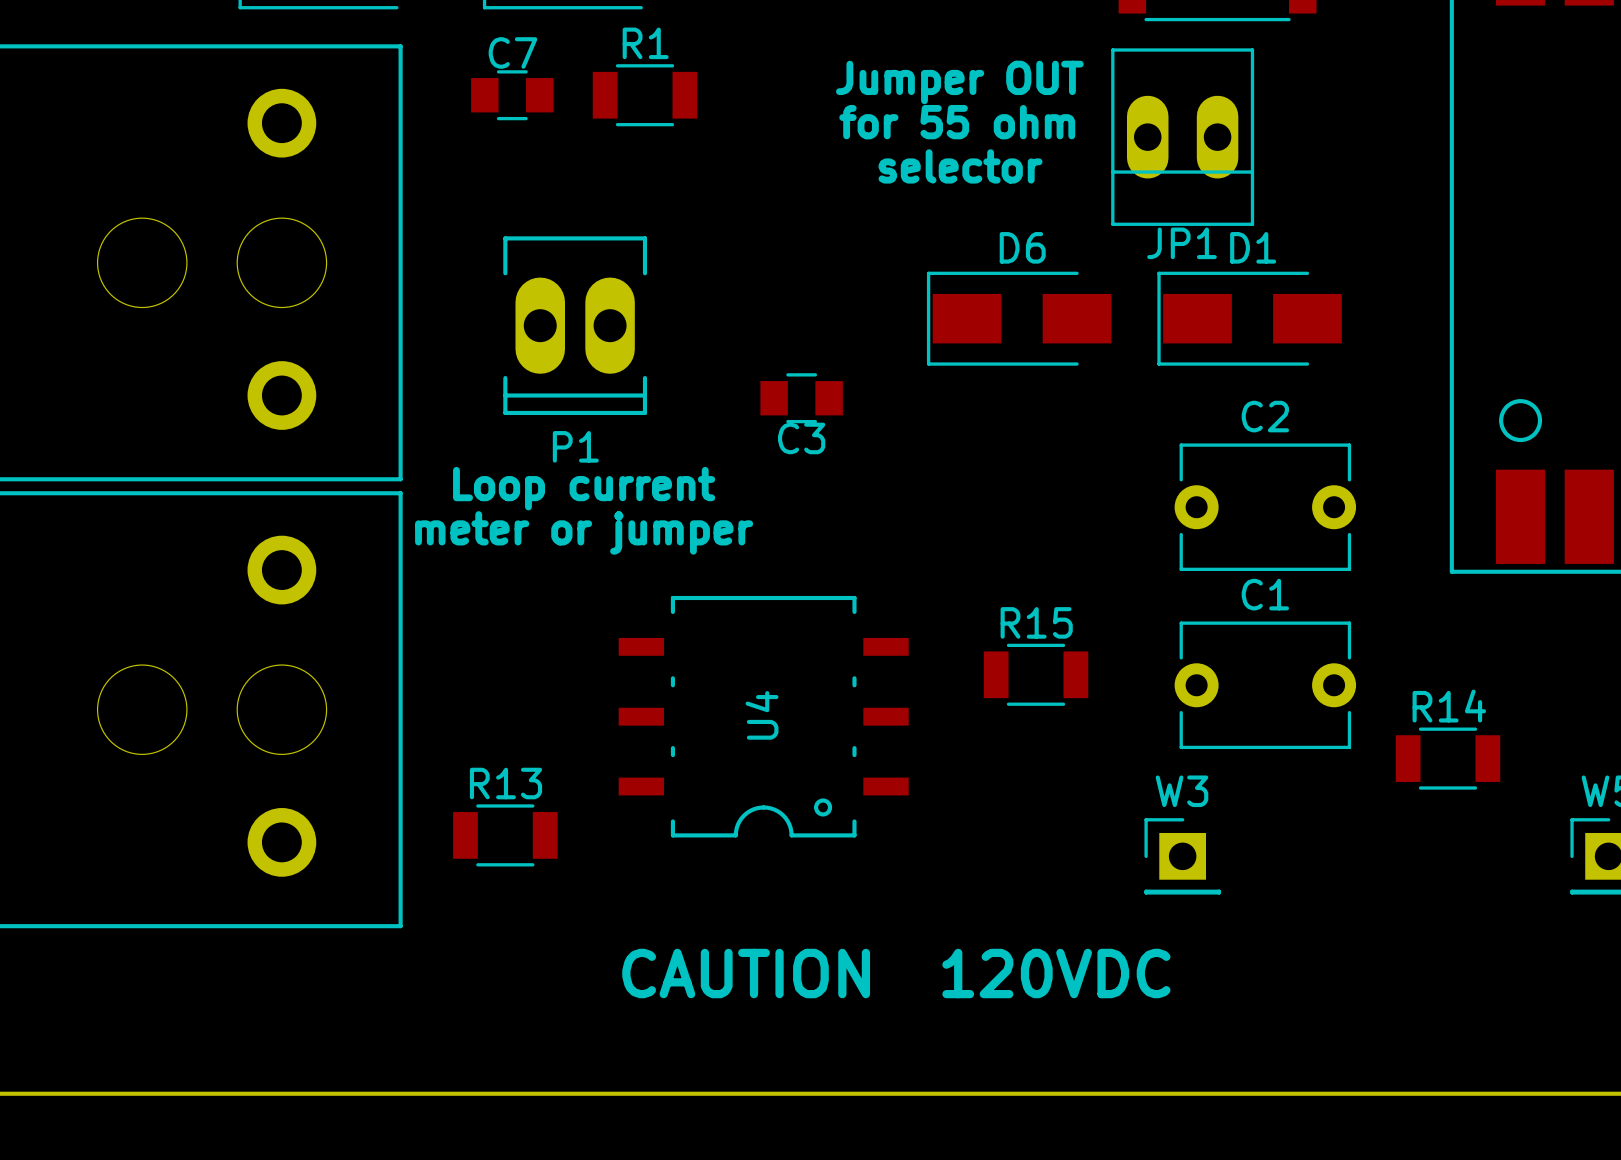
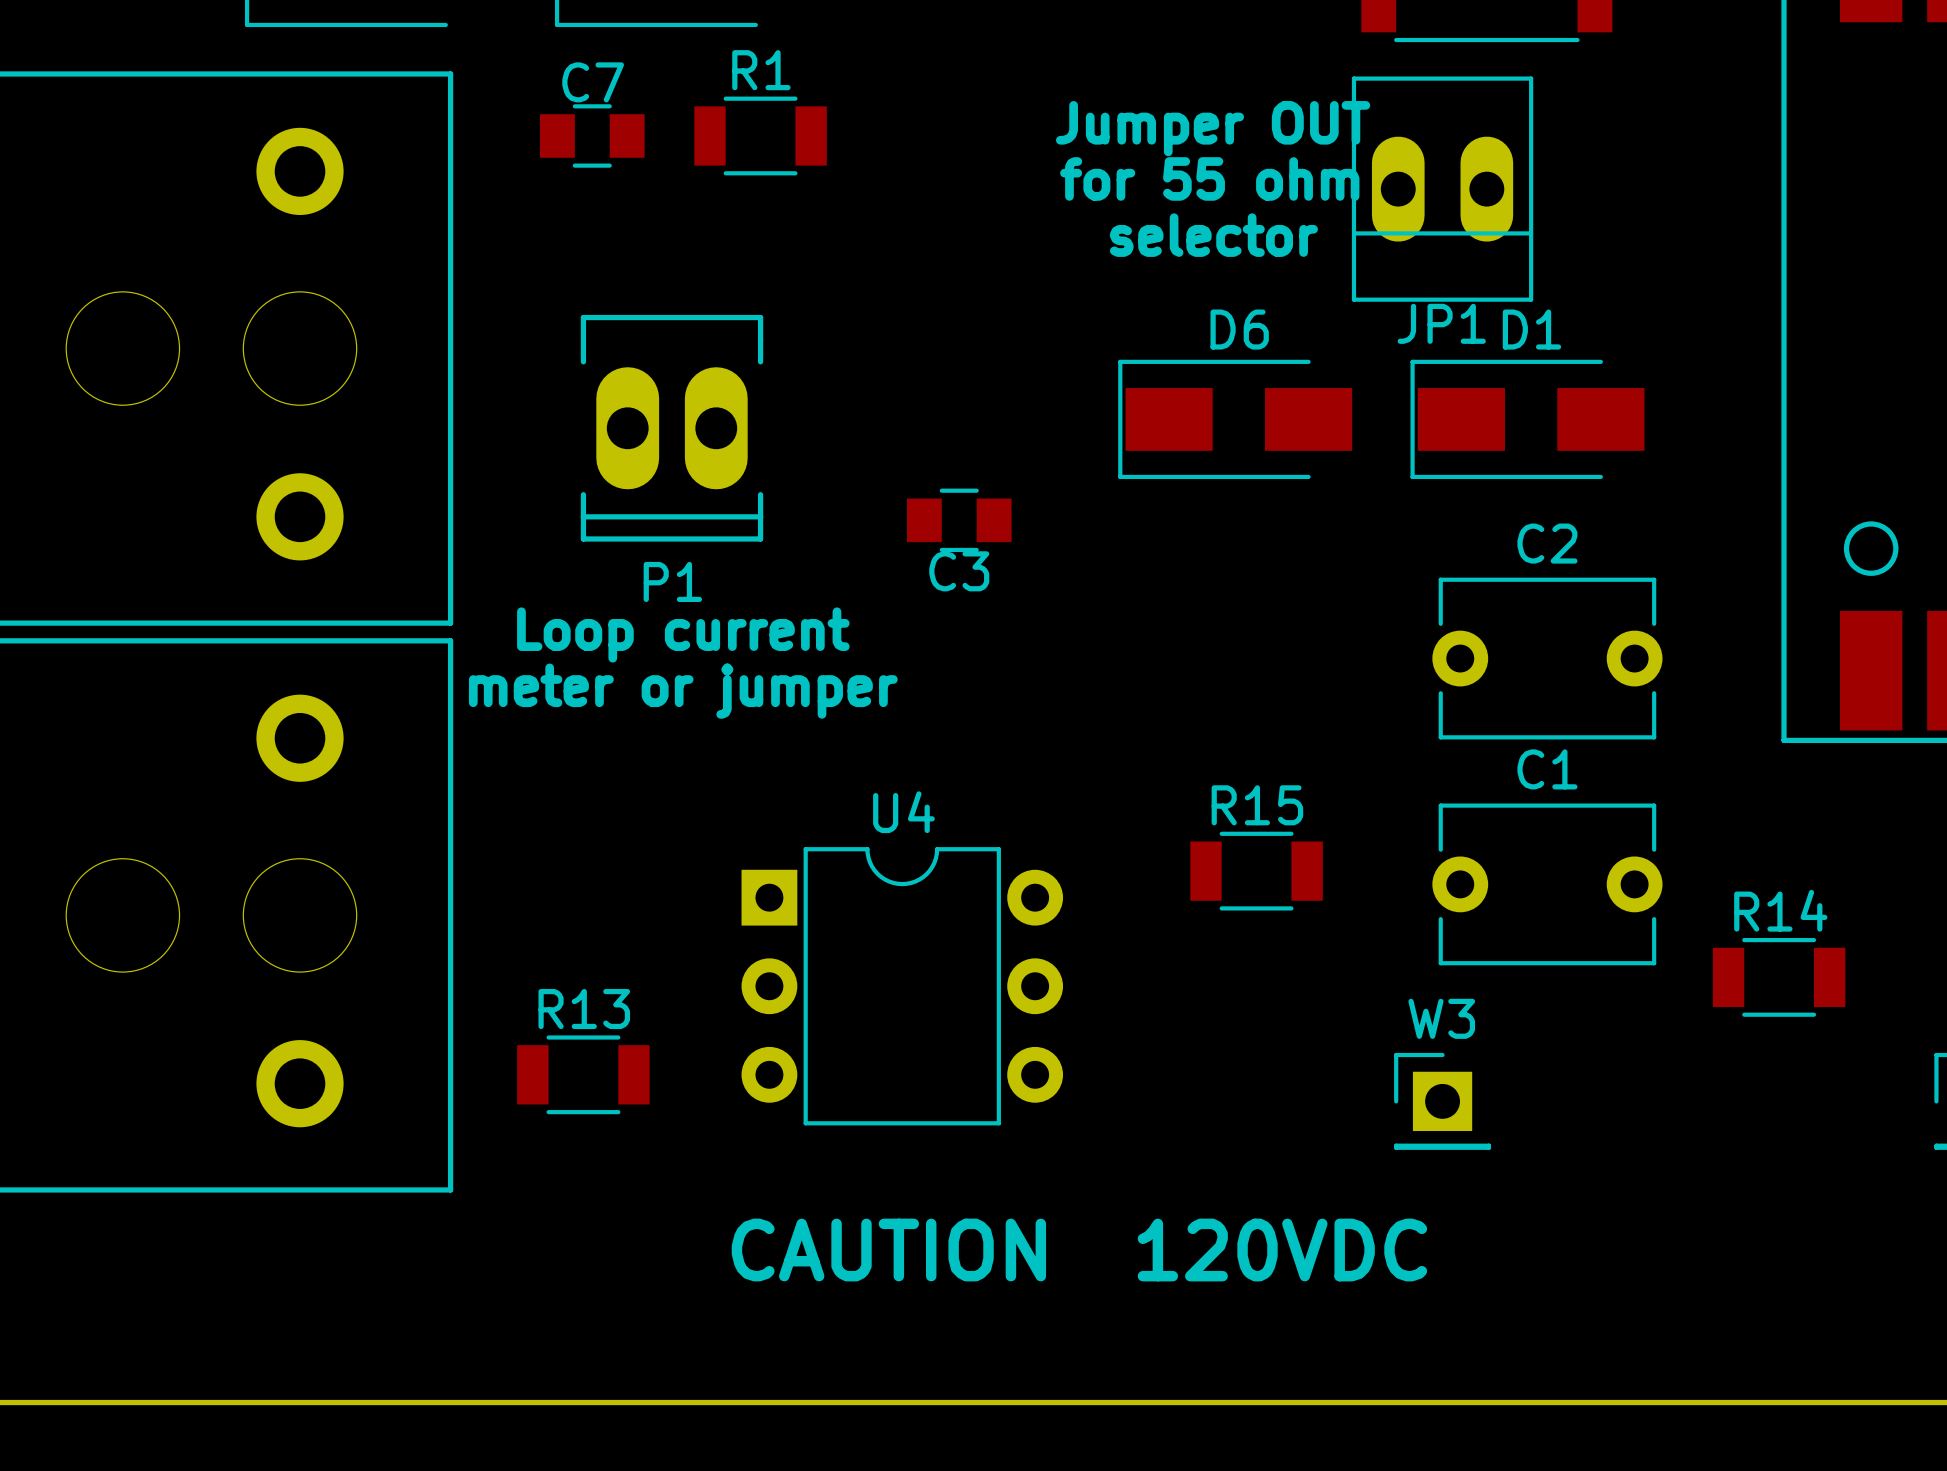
text position: Jumper OUT (959, 82) -> Jumper OUT (1213, 128)
text position: for 55 ohm (957, 122) -> for 55 ohm (1209, 178)
text position: selector (960, 166) -> selector (1213, 235)
U4 footprint: [618, 595, 909, 838] -> [741, 847, 1064, 1126]
U4 name position: U4 (762, 715) -> U4 (903, 812)

